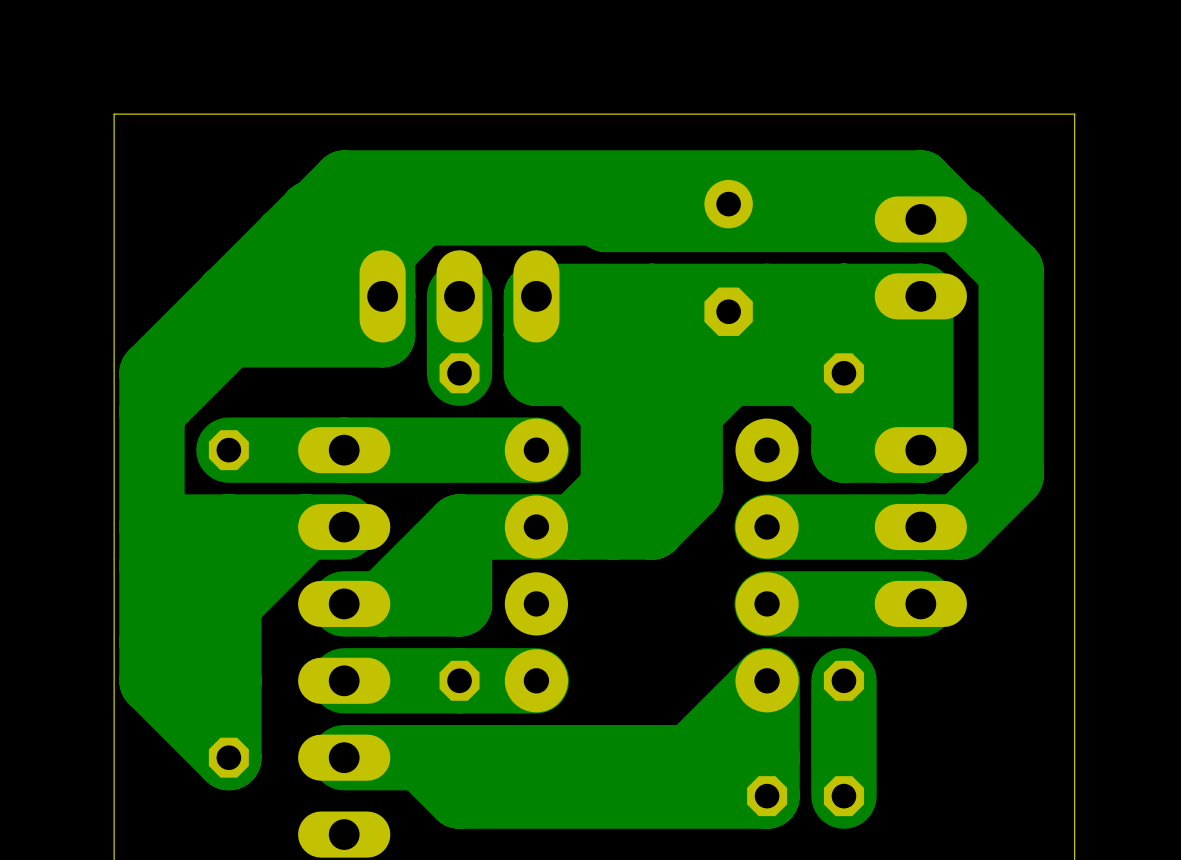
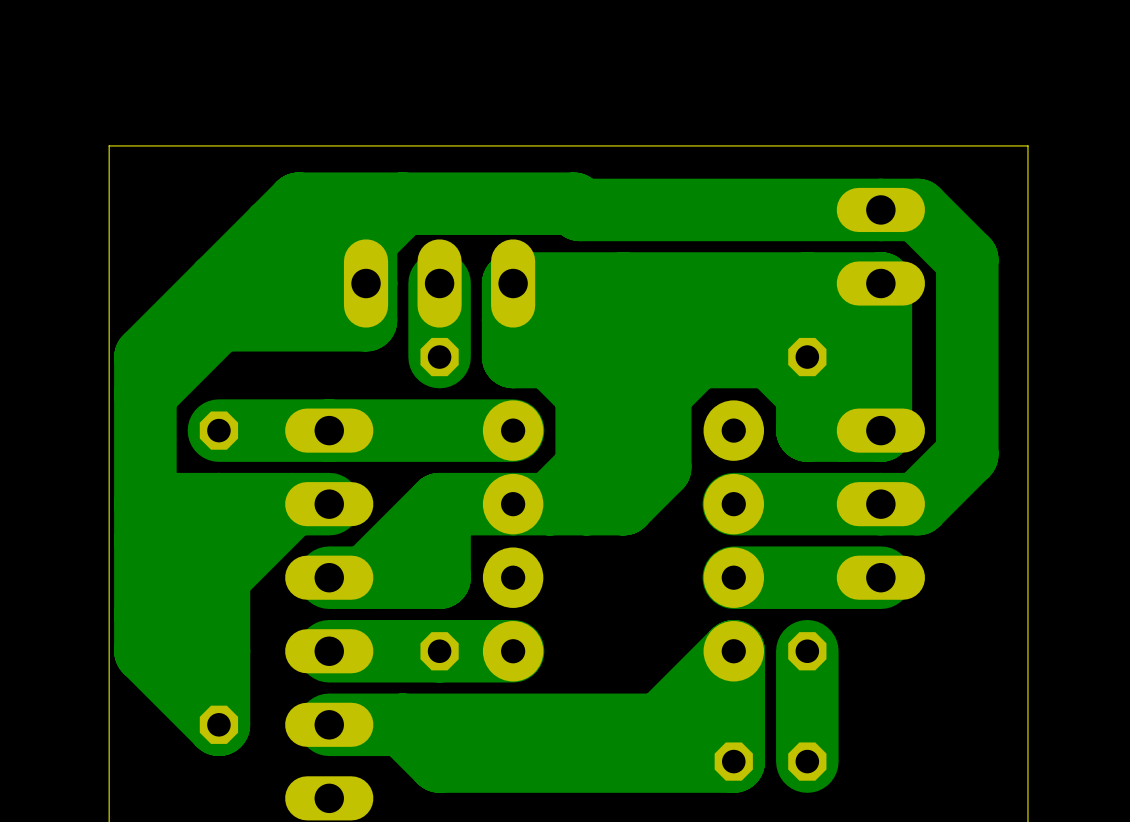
board edge: (1074, 152) (1074, 114) (114, 114) (114, 152) -> (1027, 145) (109, 145)
bottom track: (959, 219) (920, 181) (344, 181) (286, 238) -> none
part: (728, 257) -> none

